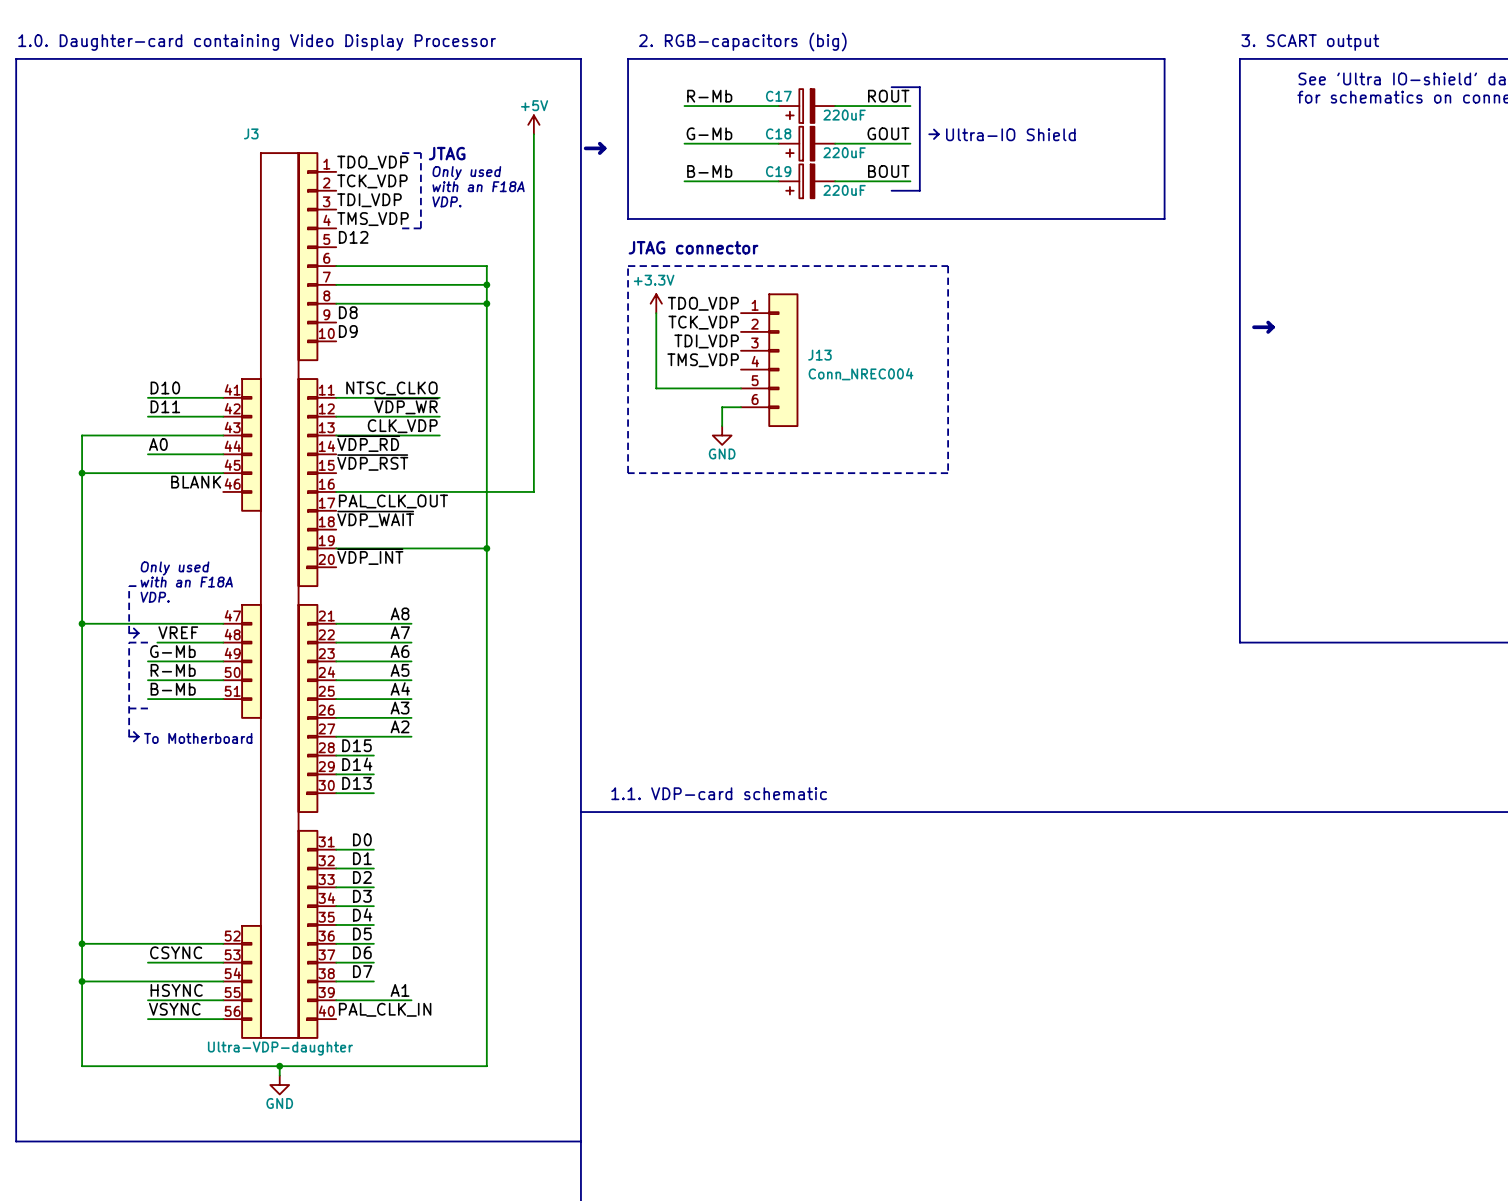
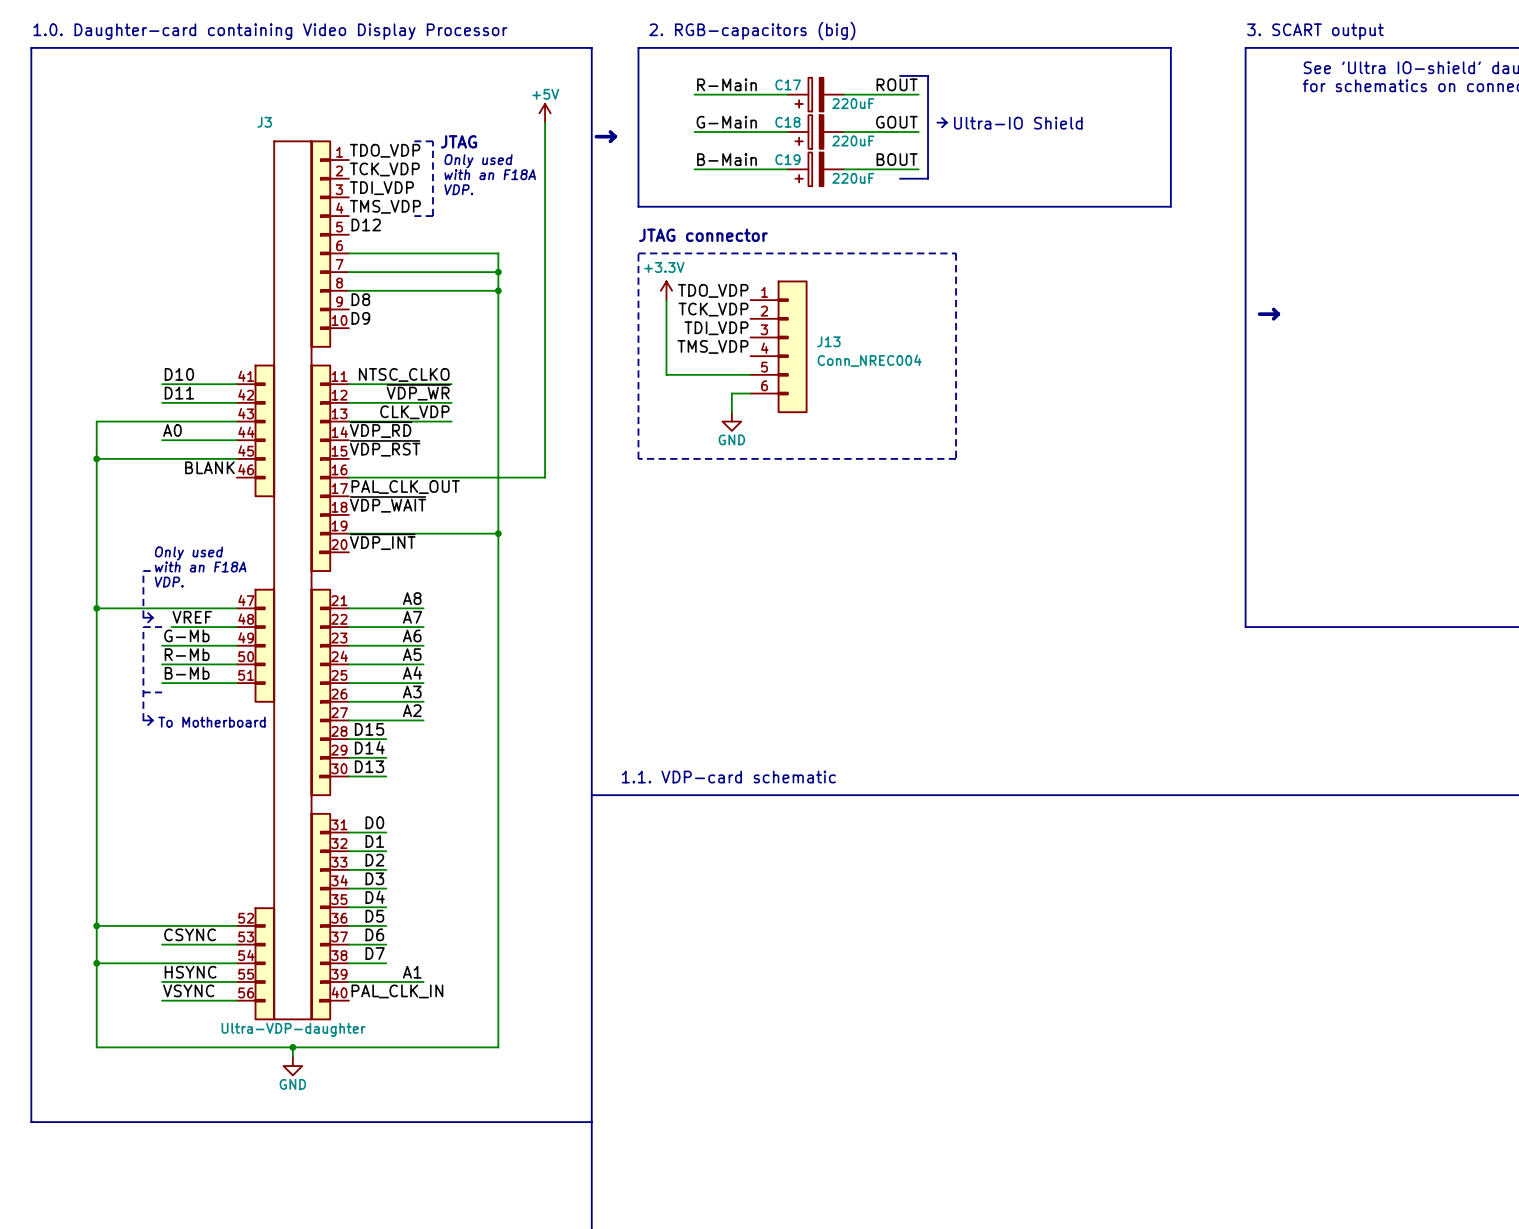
label: R-Mb (709, 96) -> R-Main (727, 84)
label: G-Mb (709, 133) -> G-Main (726, 122)
label: B-Mb (709, 171) -> B-Main (727, 159)

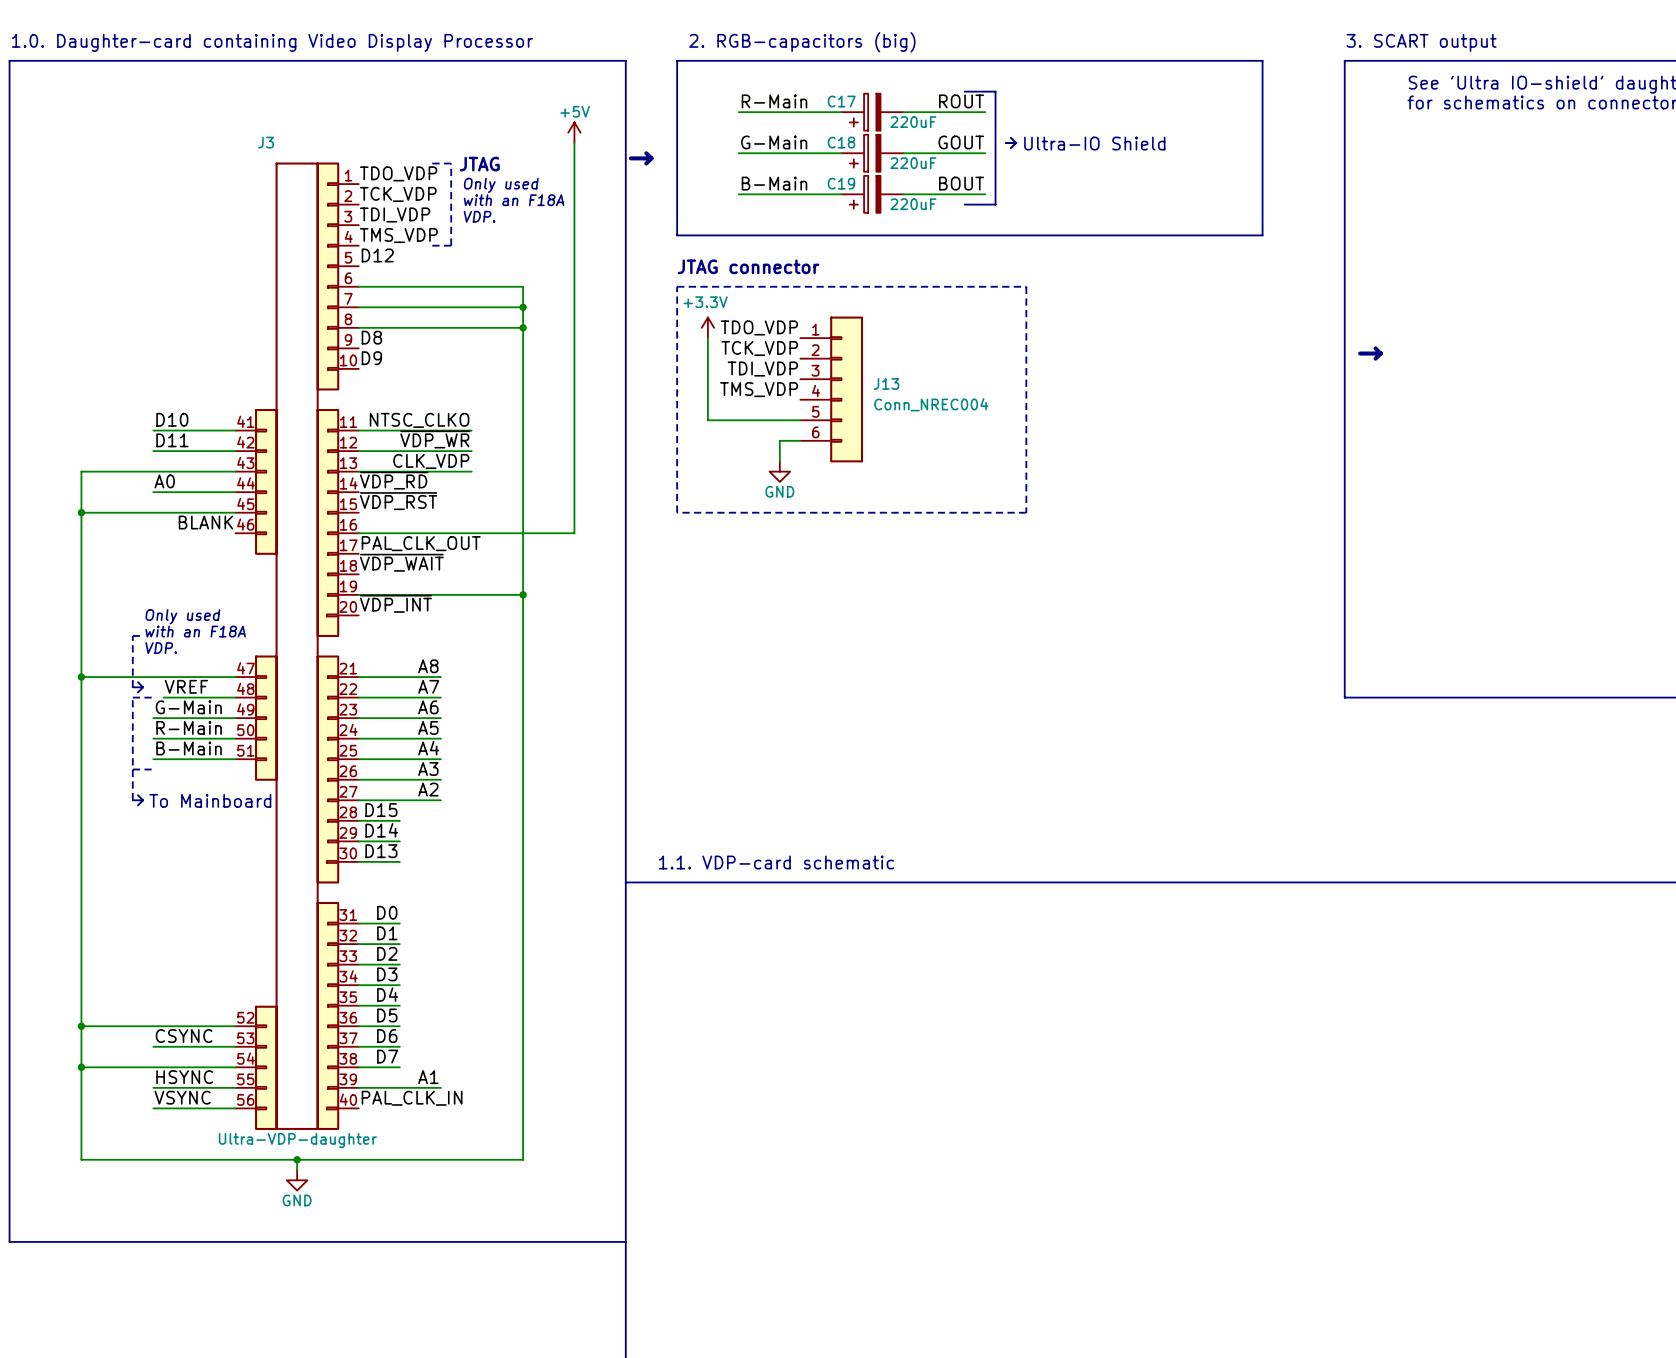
label: G-Mb (186, 635) -> G-Main (188, 707)
label: R-Mb (187, 654) -> R-Main (189, 727)
label: B-Mb (187, 673) -> B-Main (189, 748)
text: To Motherboard (211, 722) -> To Mainboard (210, 800)

